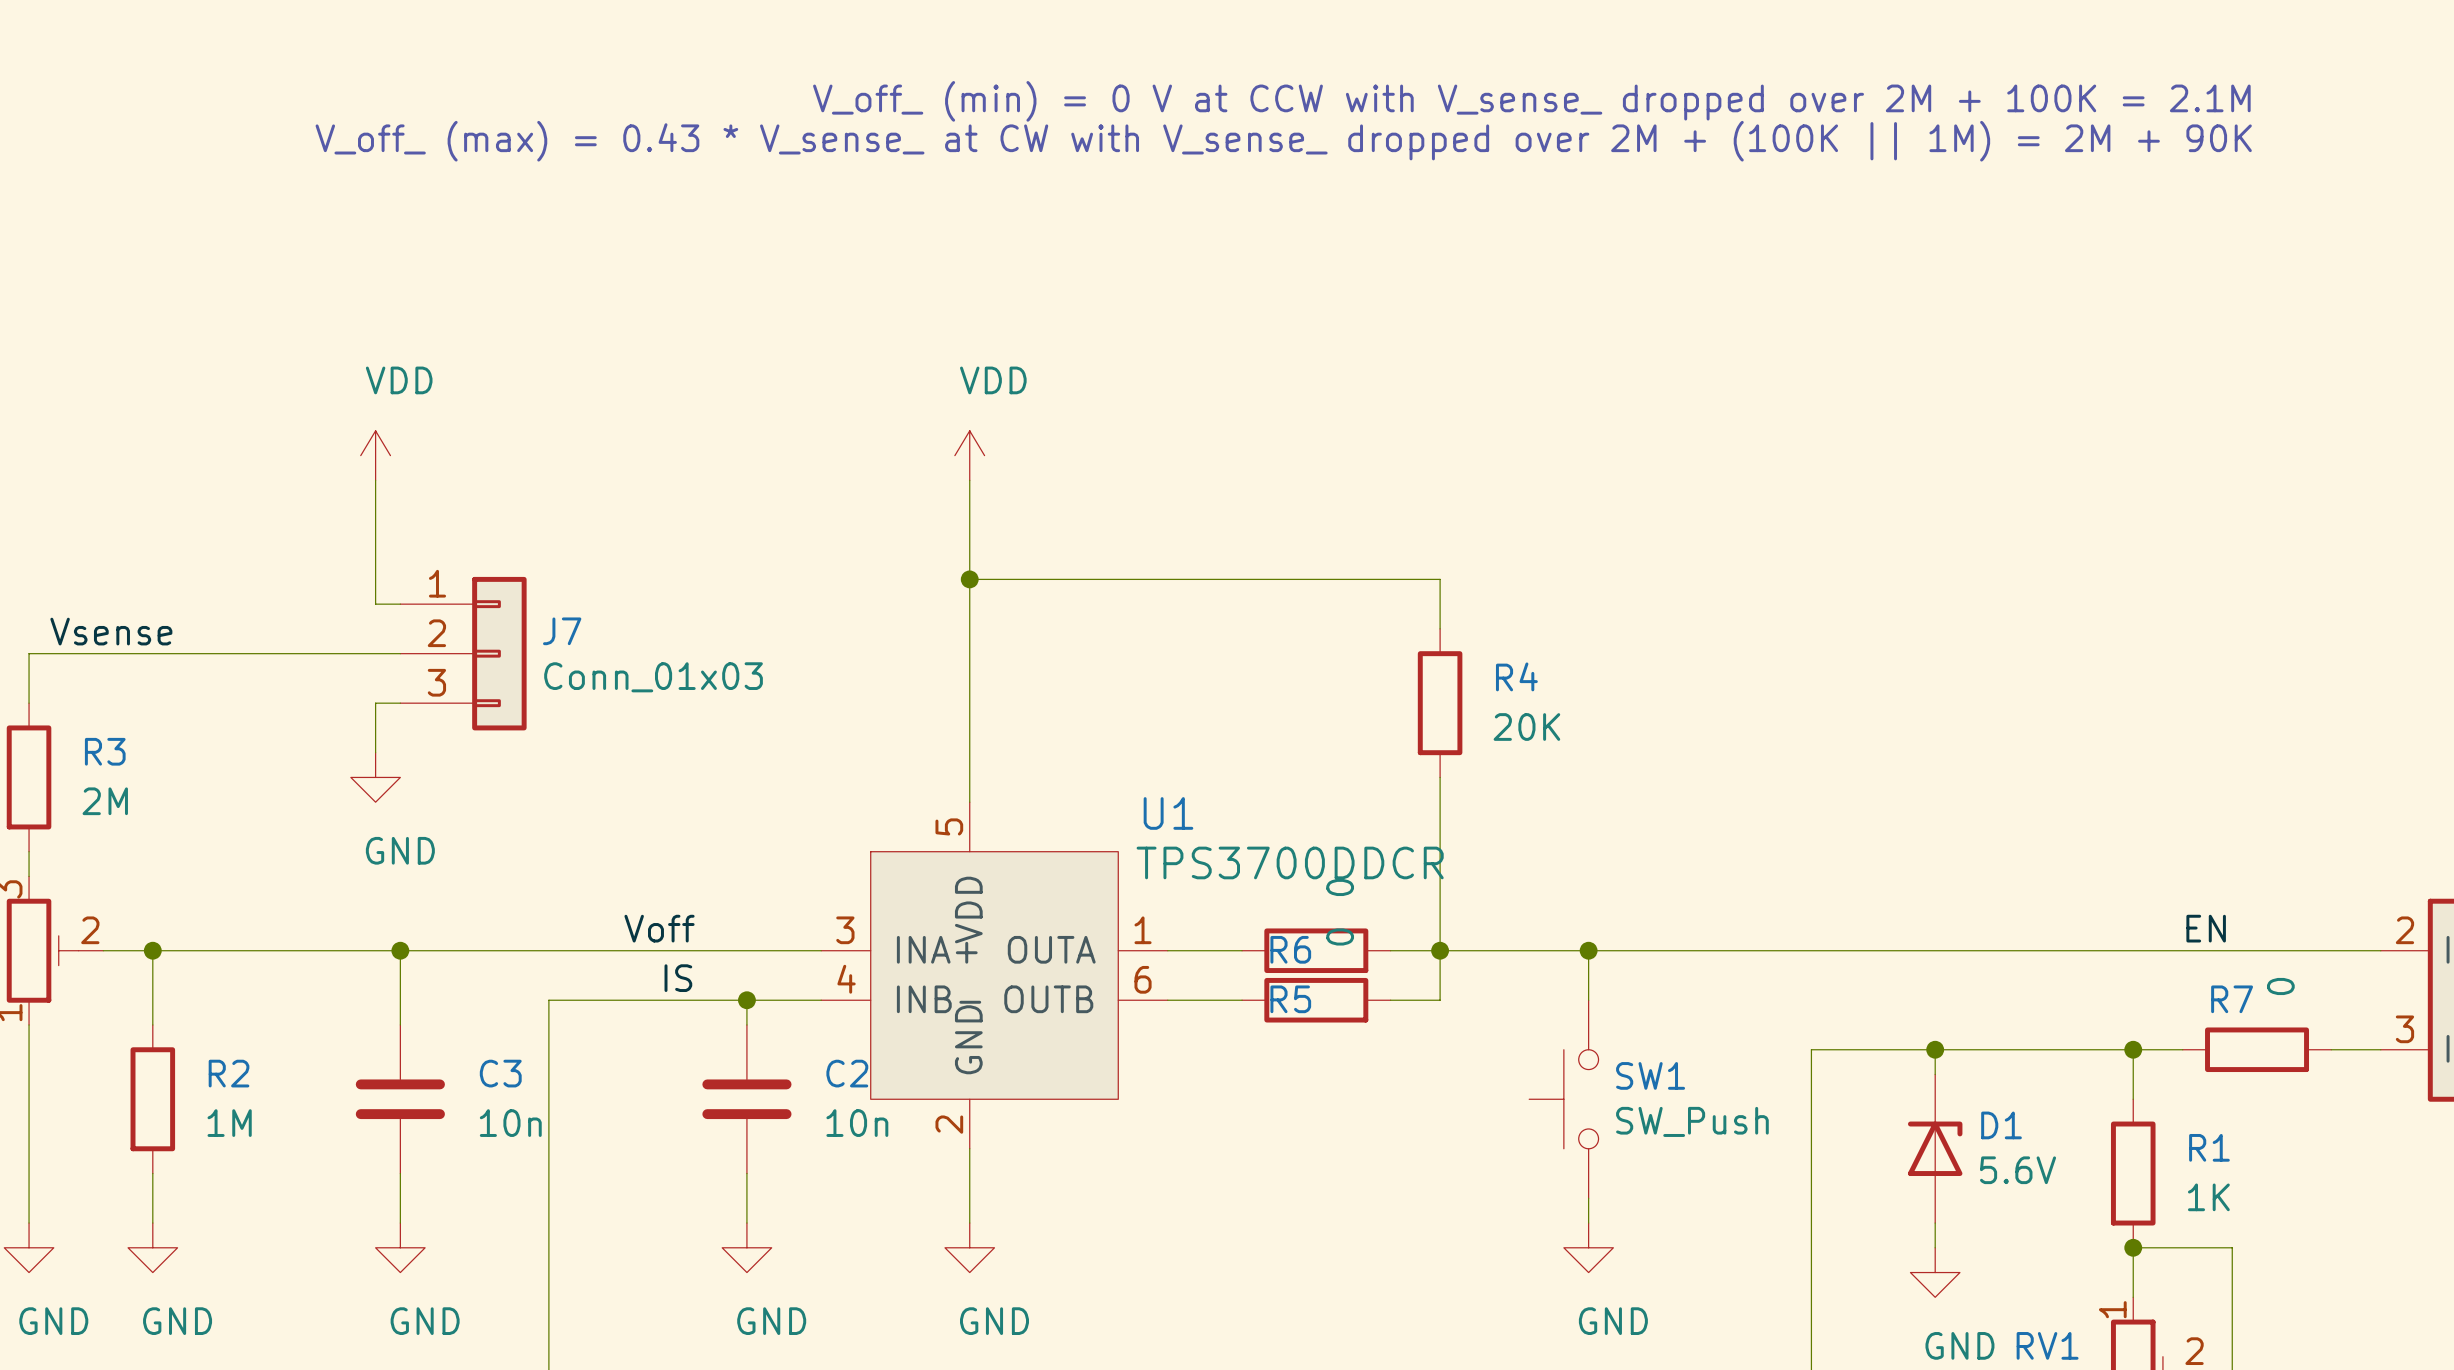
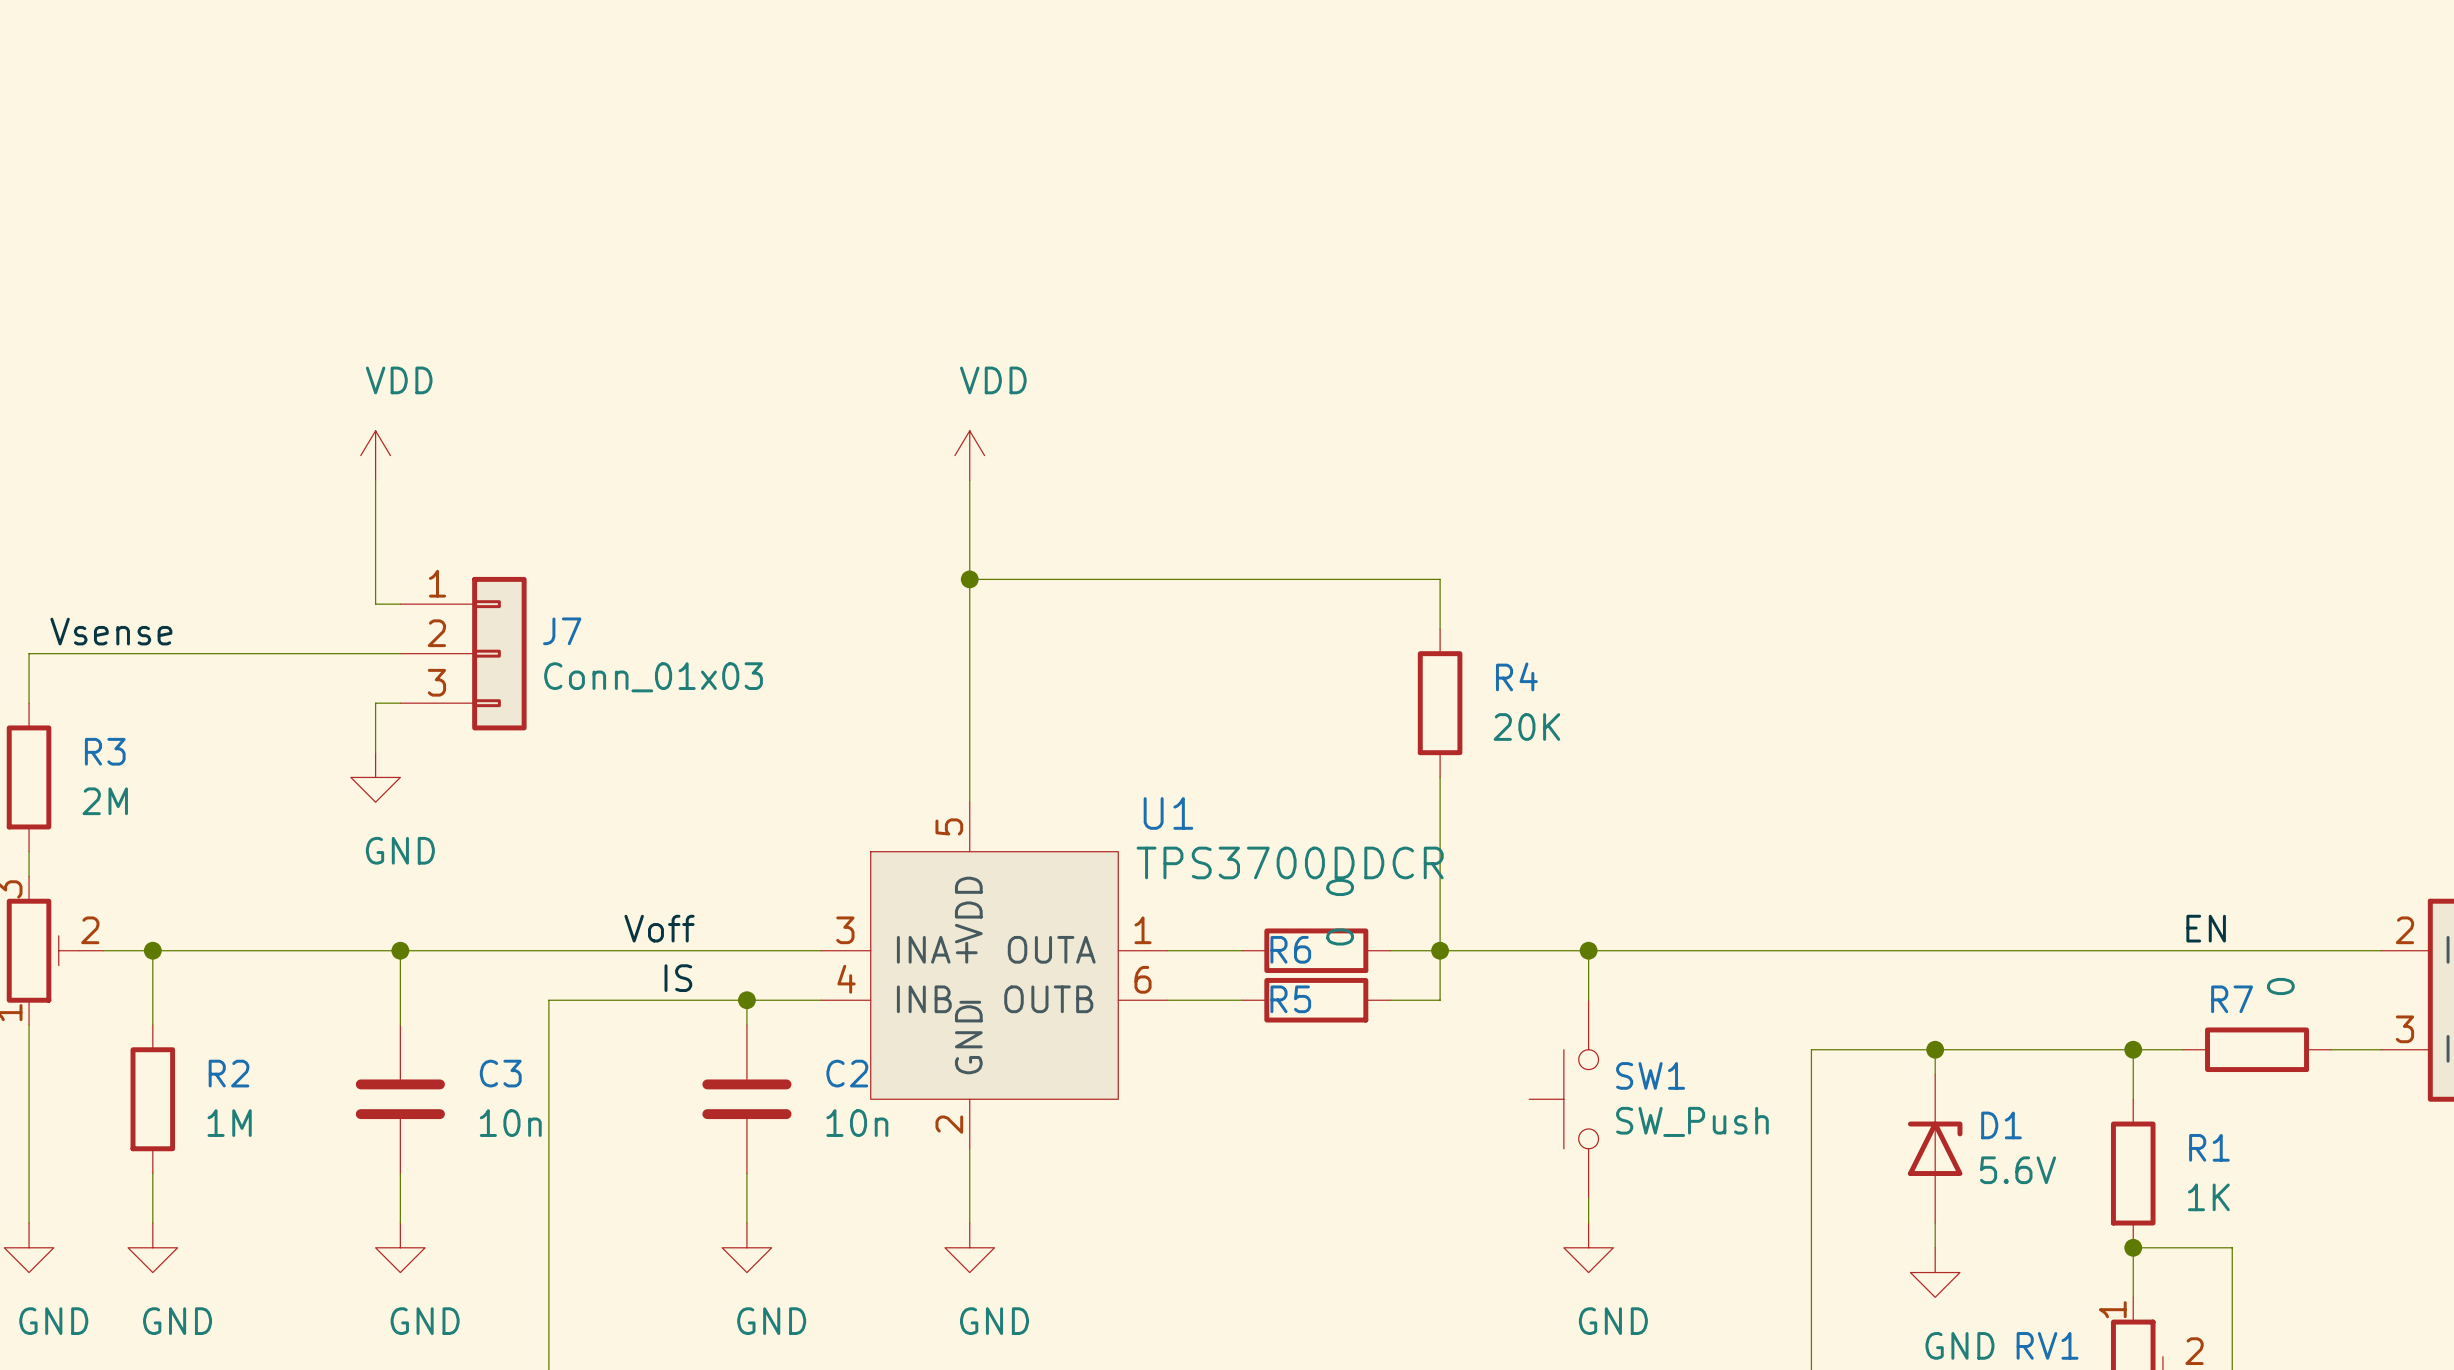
text: V_off_ (min) = 0 V at CCW with V_sense_ dropped over 2M + 100K = 2.1M (1531, 101) -> none
text: V_off_ (max) = 0.43 * V_sense_ at CW with V_sense_ dropped over 2M + (100K || 1M) = 2M + 90K (1283, 141) -> none

